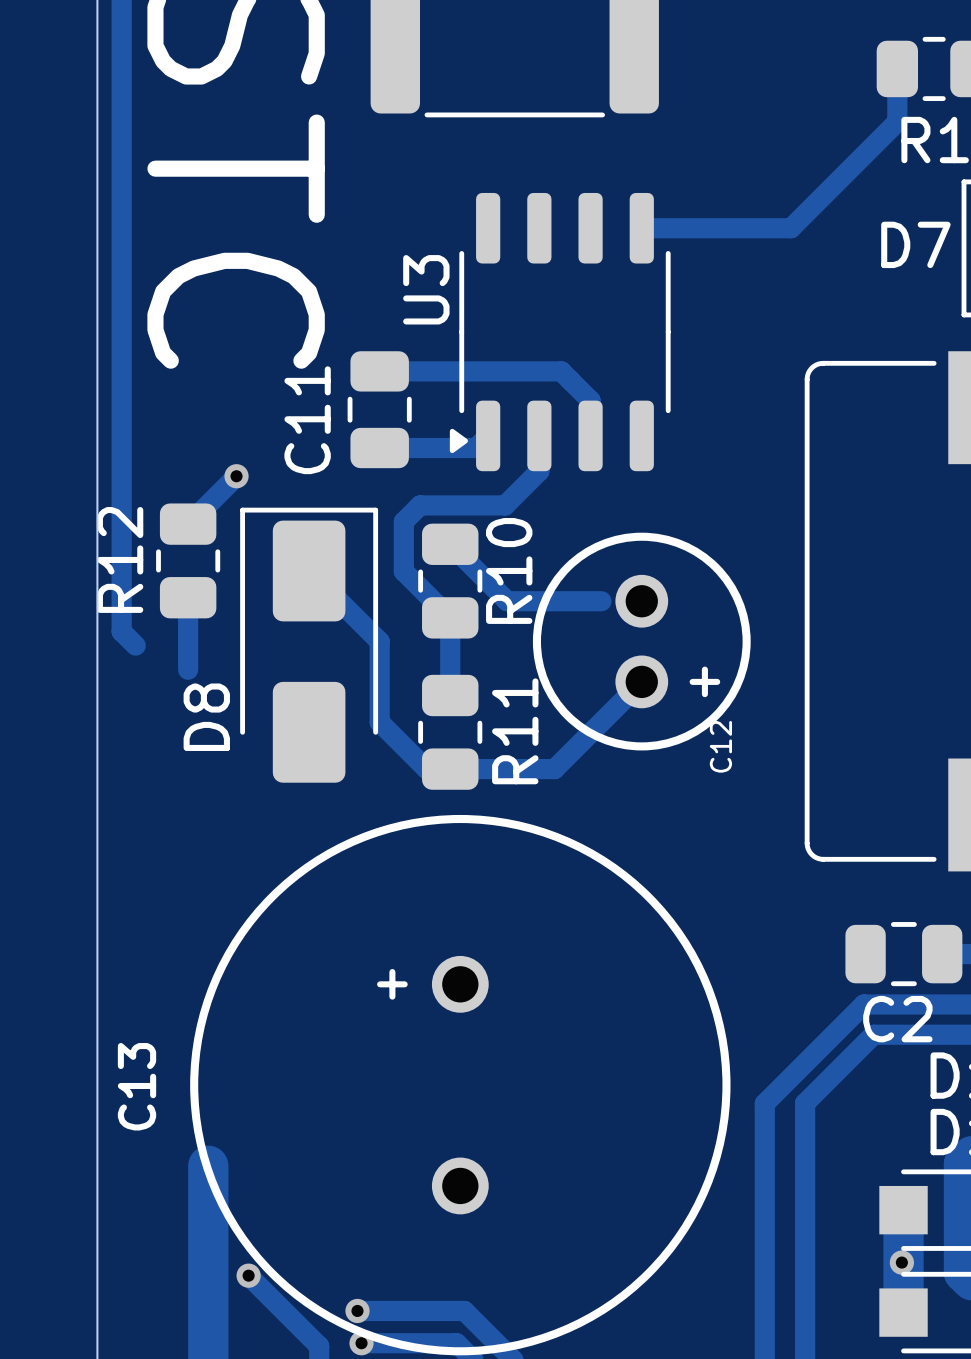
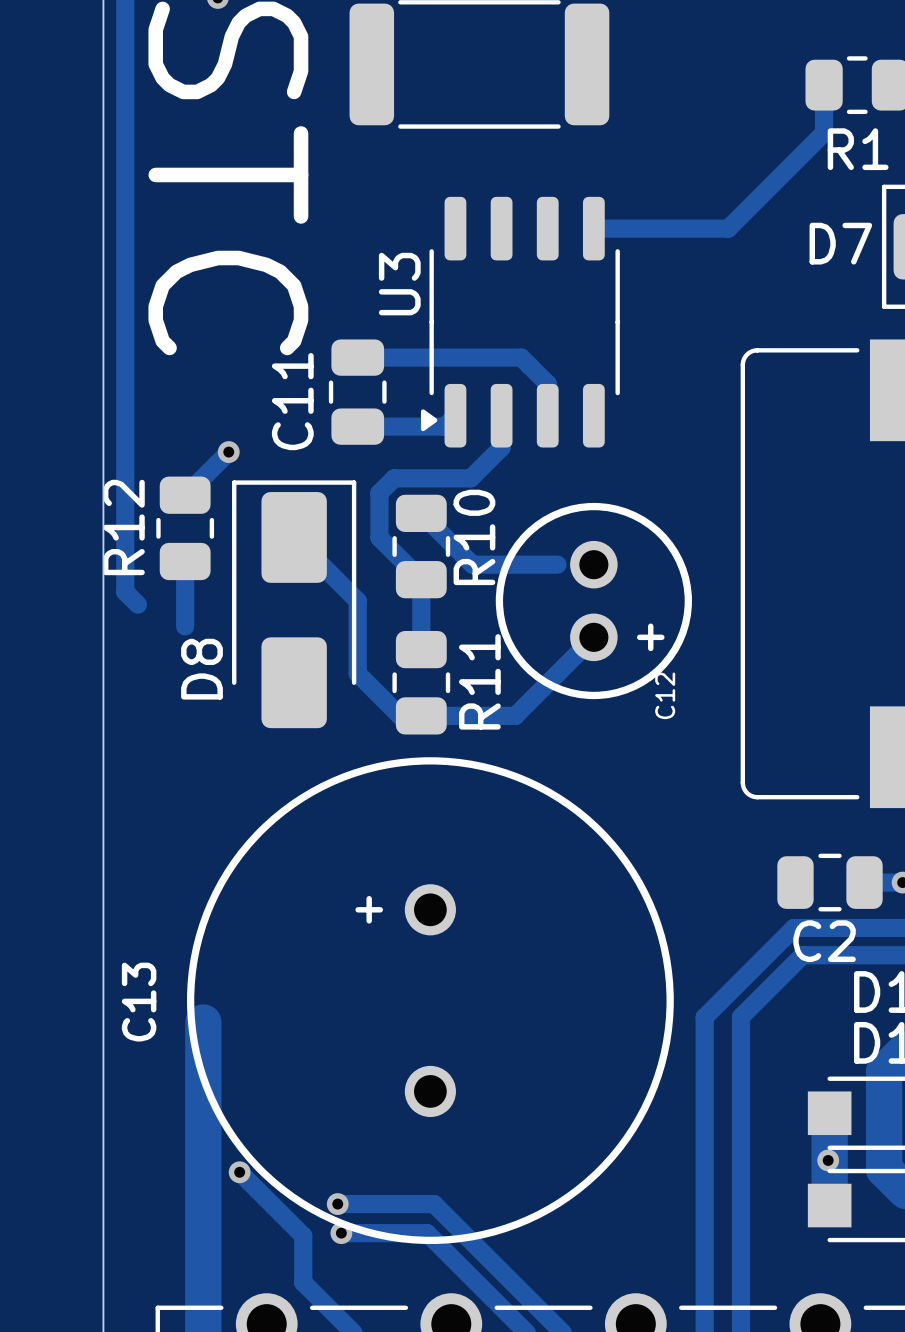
track: none -> (203, 1022) (203, 1073)

